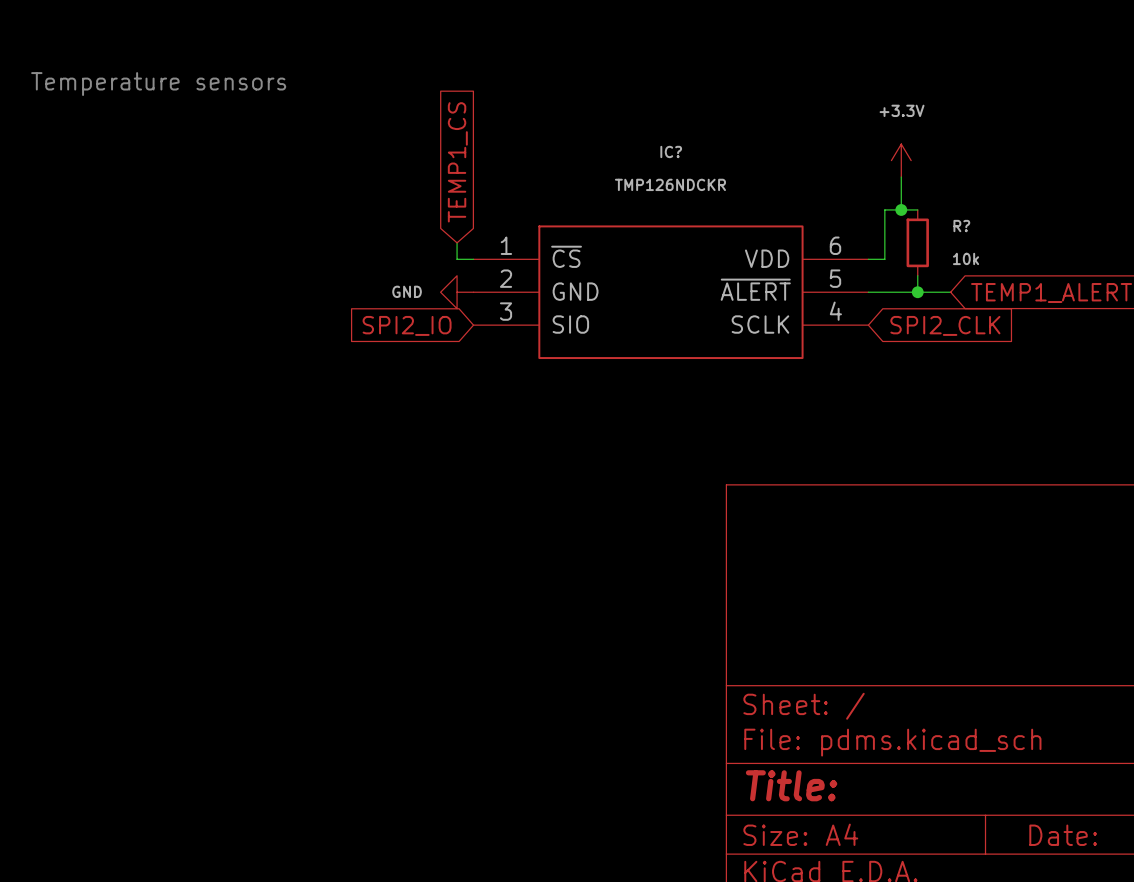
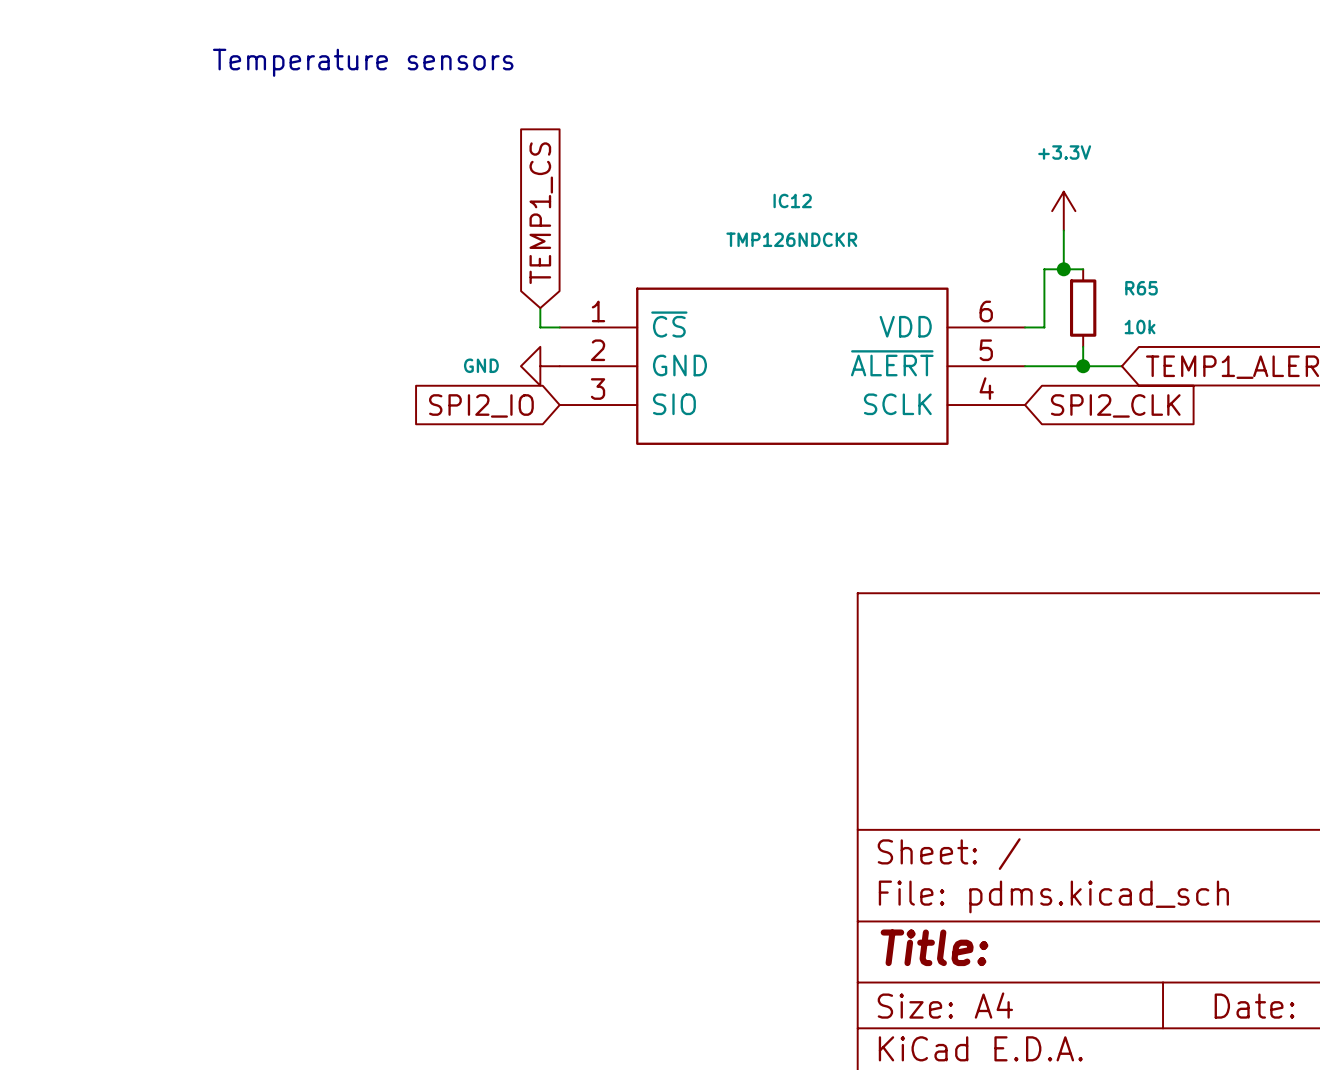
text position: Temperature sensors (158, 84) -> Temperature sensors (363, 62)
IC? name: IC? (671, 151) -> IC12 (792, 200)
R? name: R? (961, 226) -> R65 (1141, 288)

